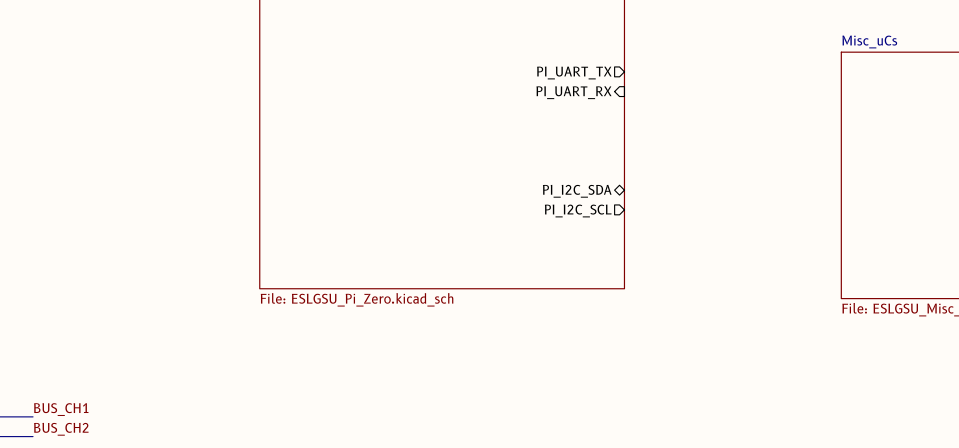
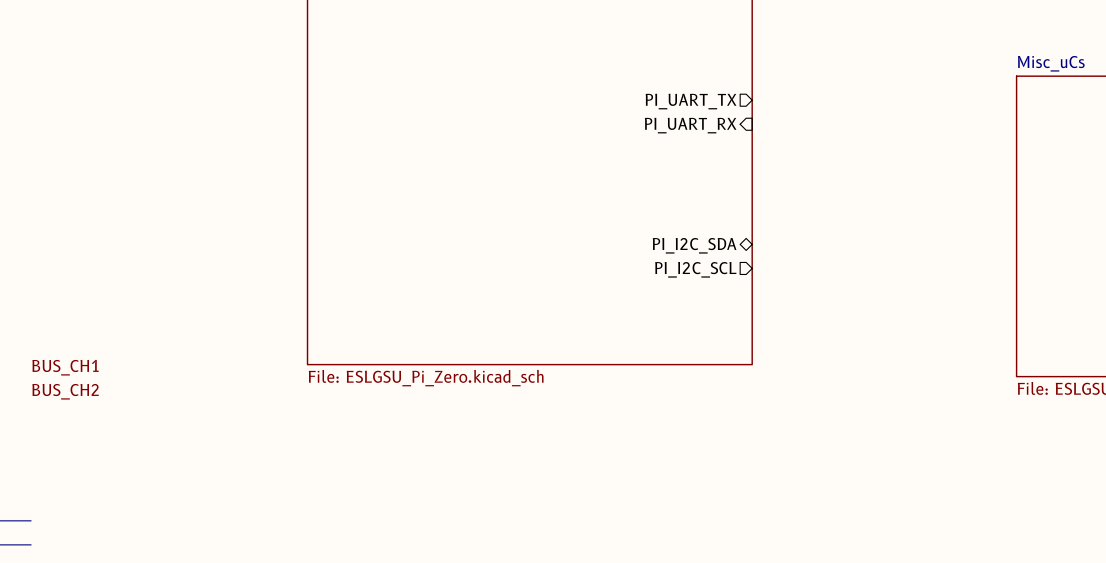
label position: BUS_CH1 (61, 409) -> BUS_CH1 (65, 367)
label position: BUS_CH2 (61, 429) -> BUS_CH2 (65, 391)

